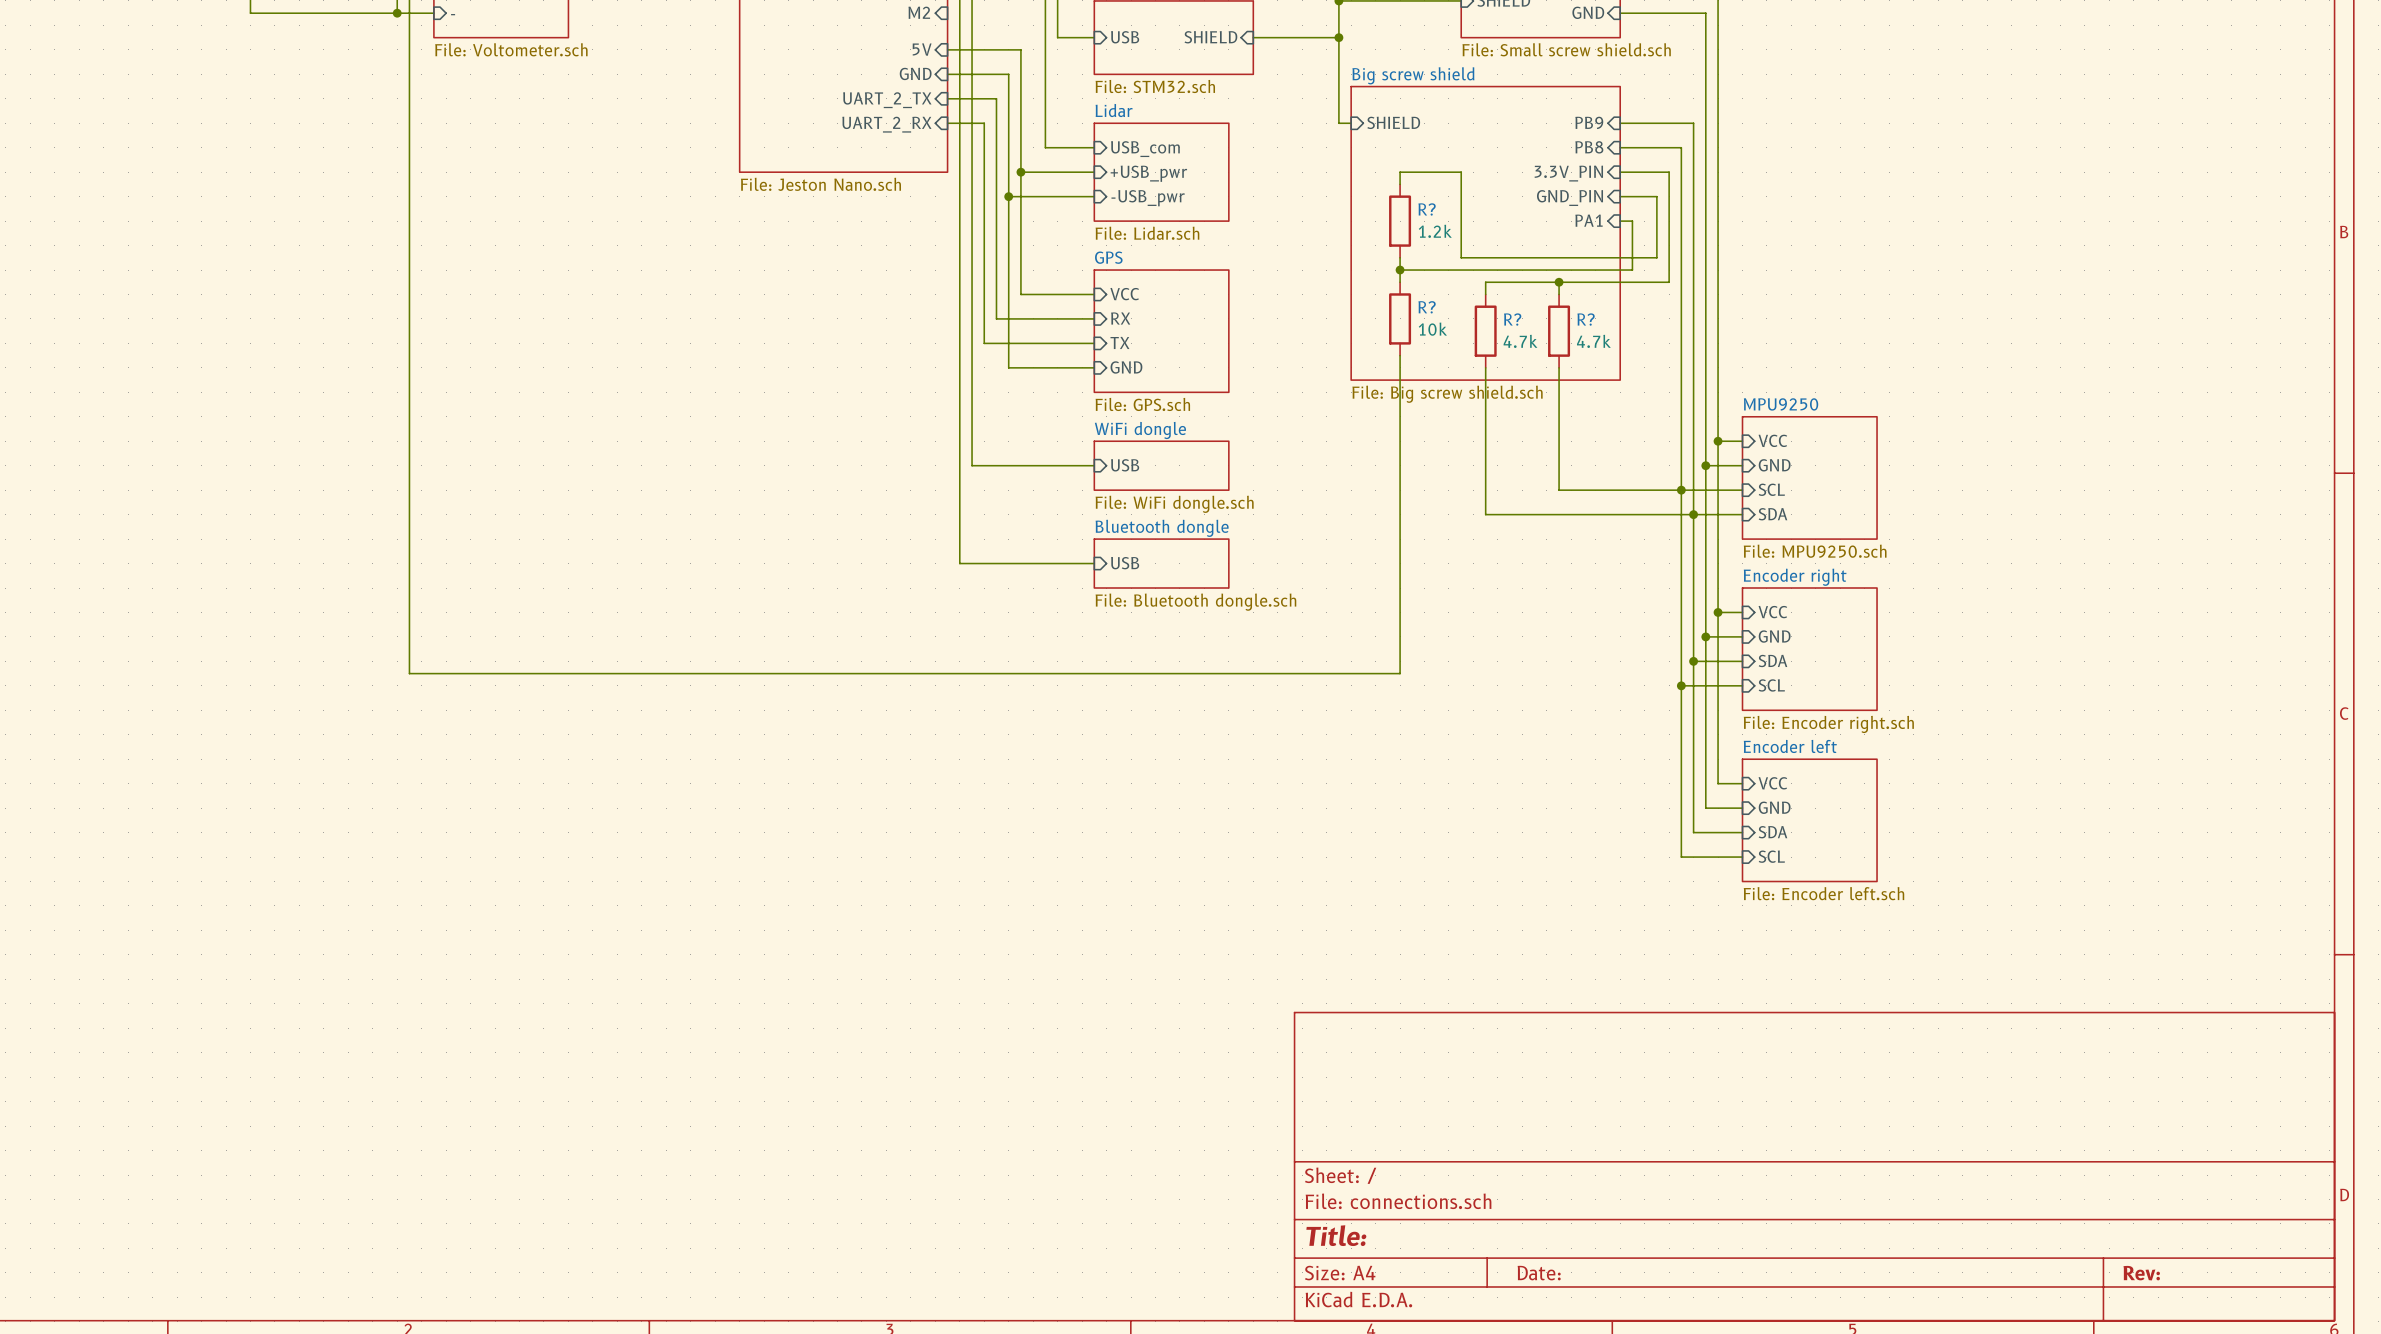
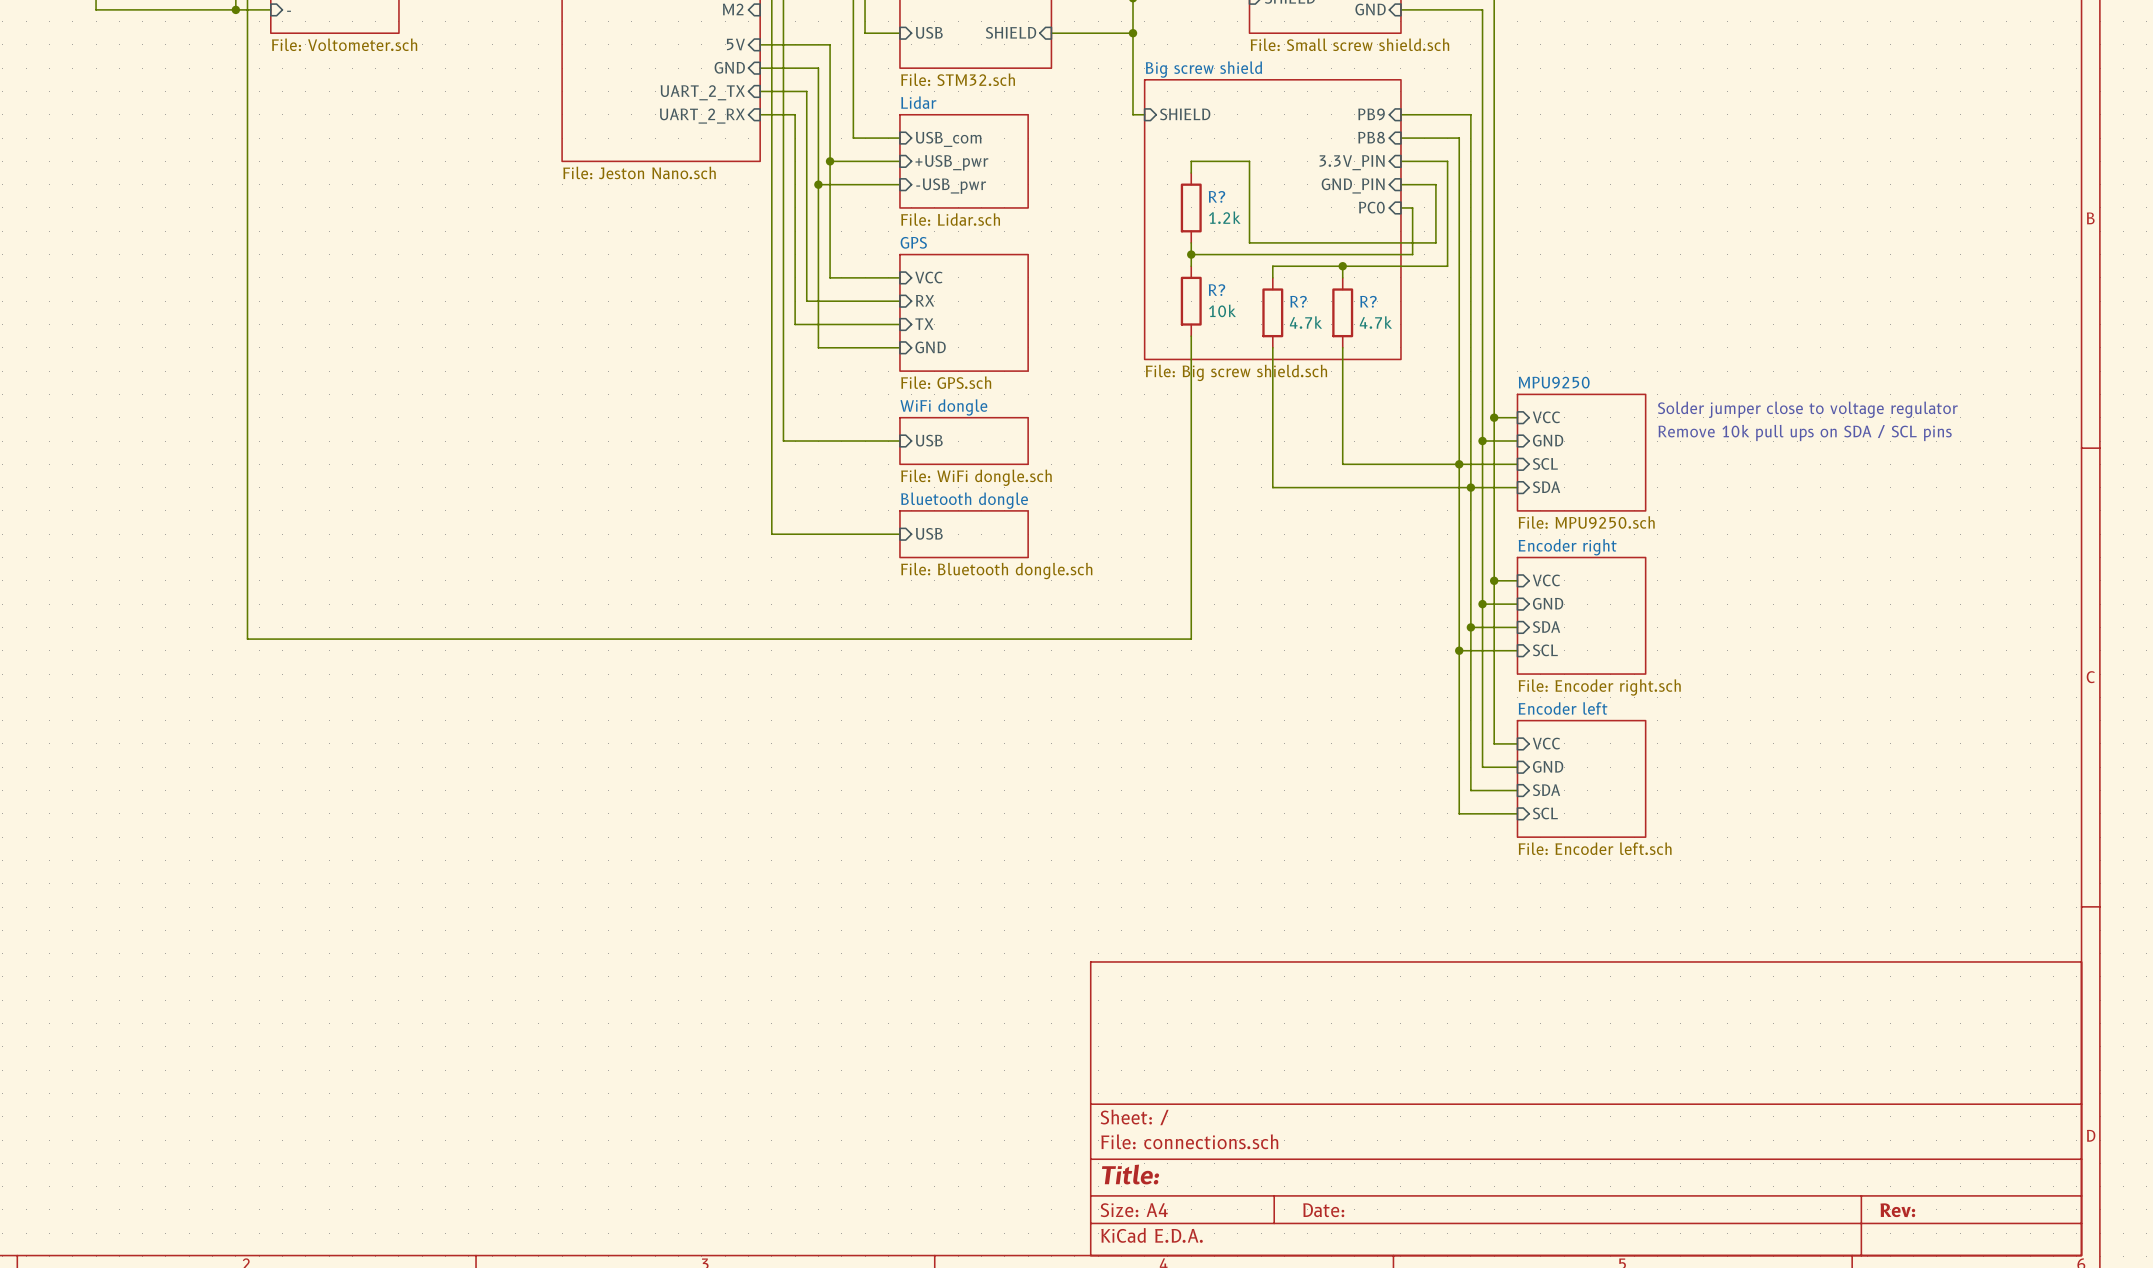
sheet pin: PA1 (1589, 220) -> PC0 (1371, 207)
text: none -> Solder jumper close to voltage regulator (1807, 409)
text: none -> Remove 10k pull ups on SDA / SCL pins (1805, 432)

